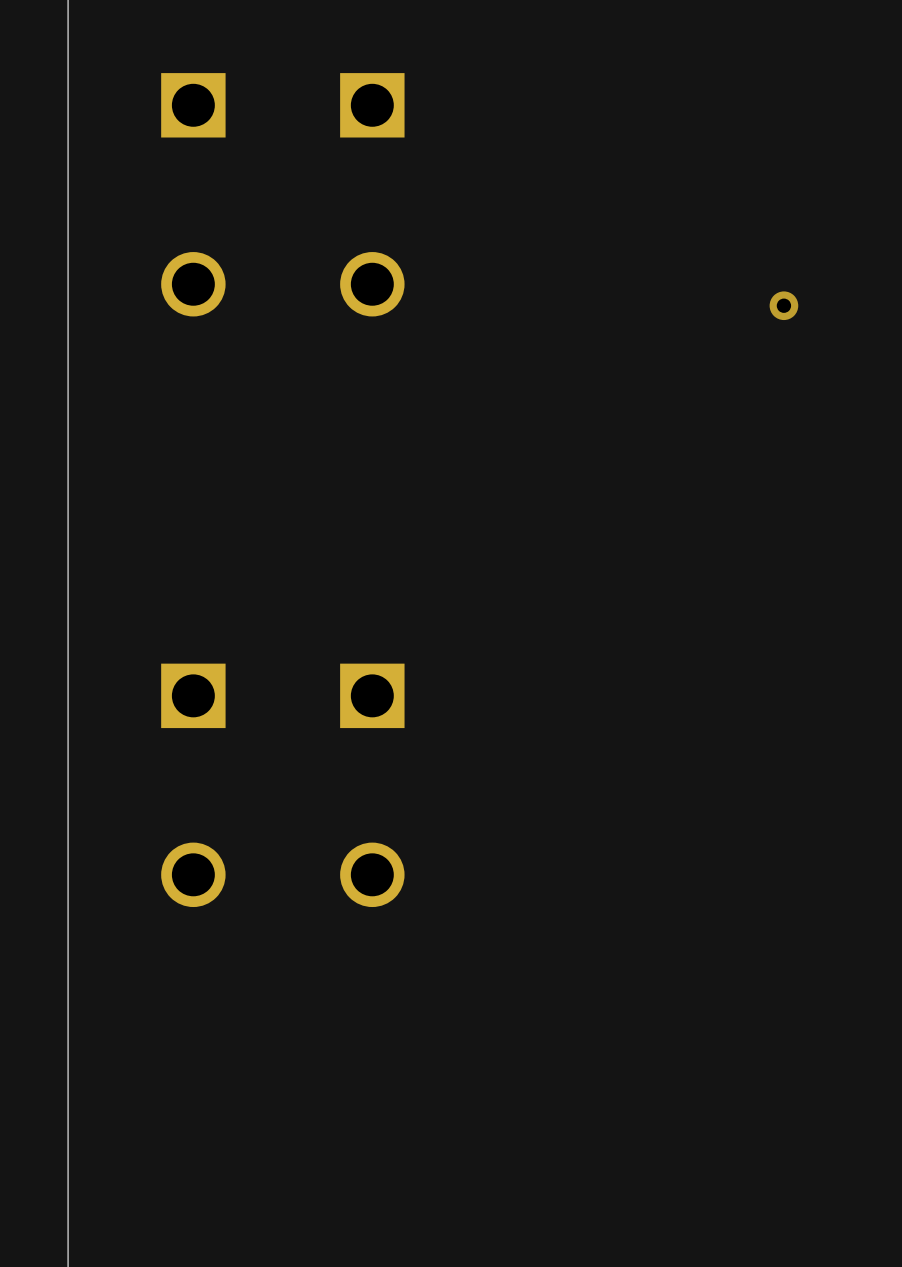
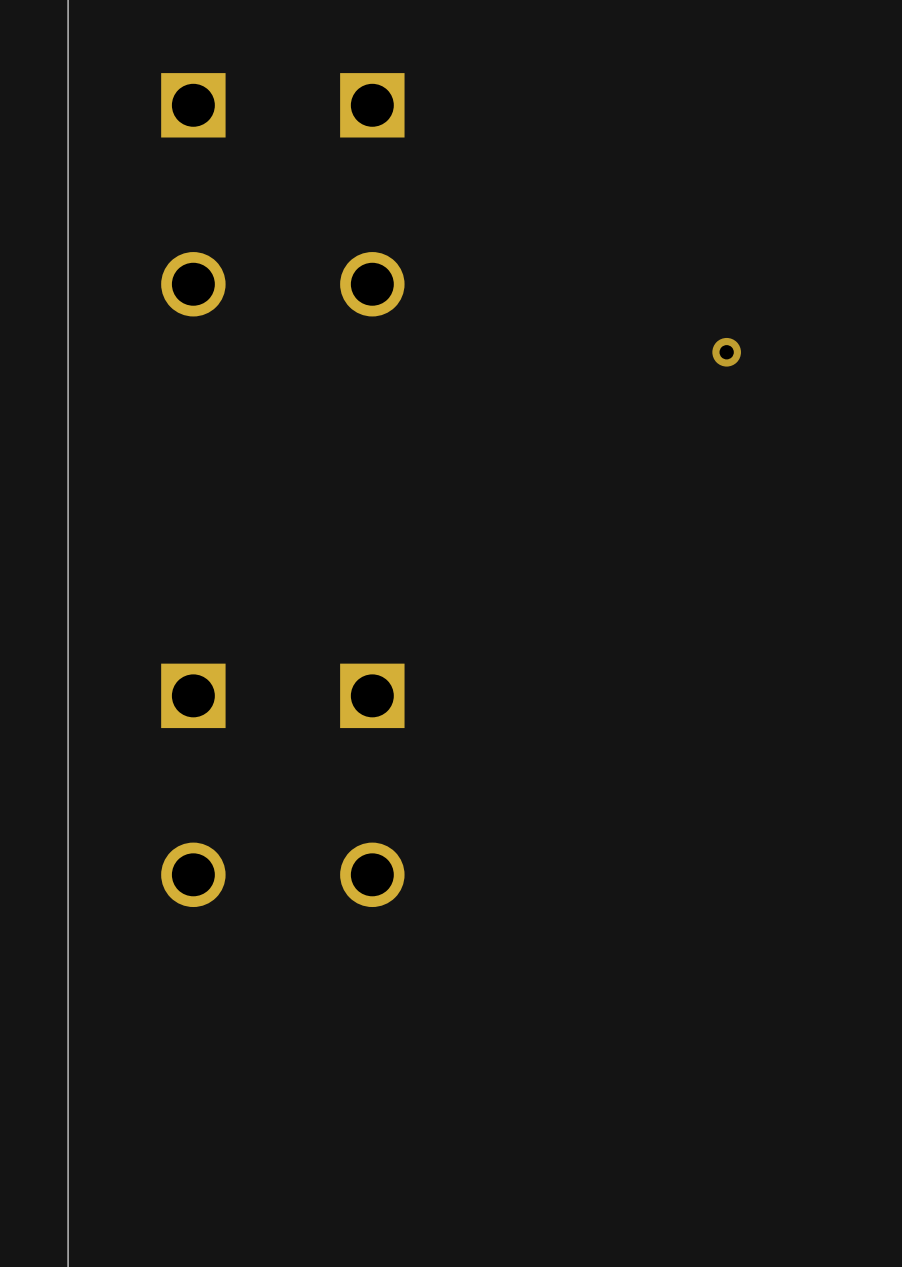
via position: (783, 305) -> (726, 352)

